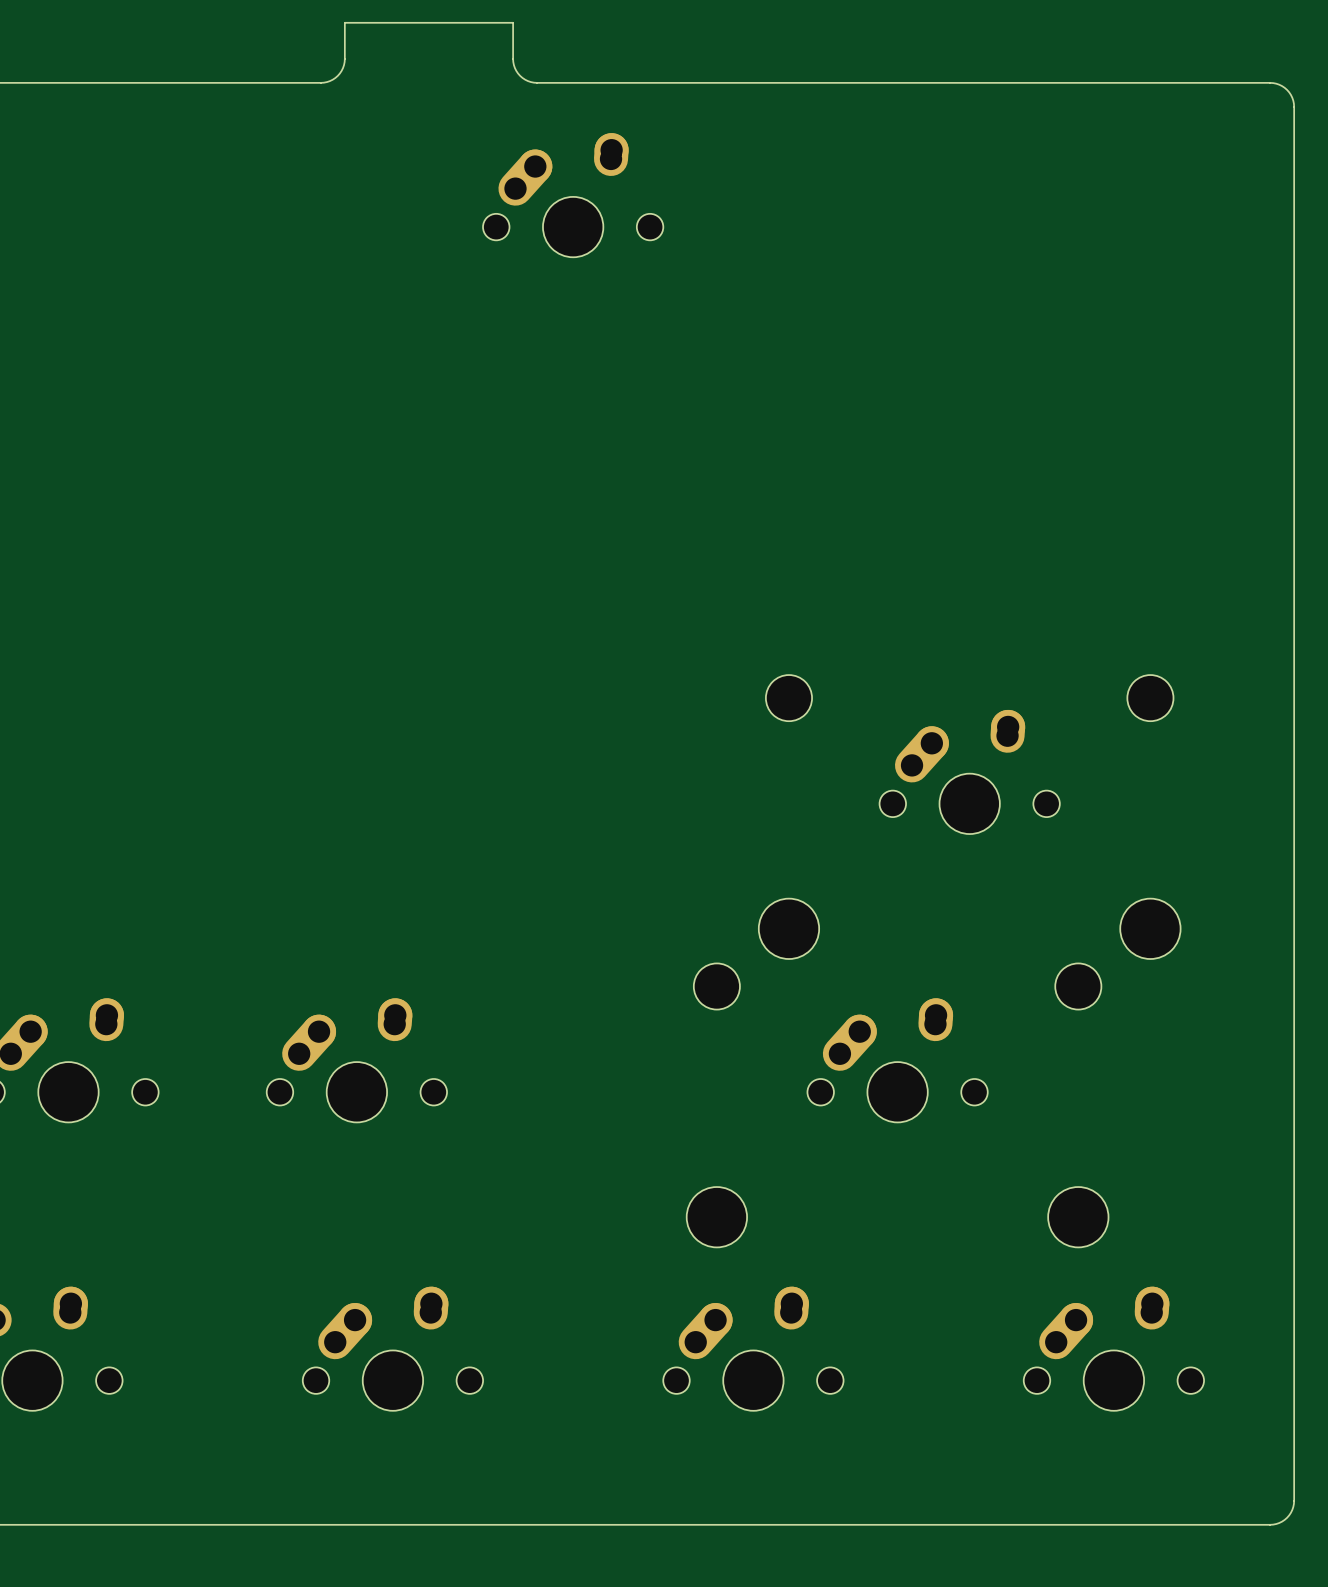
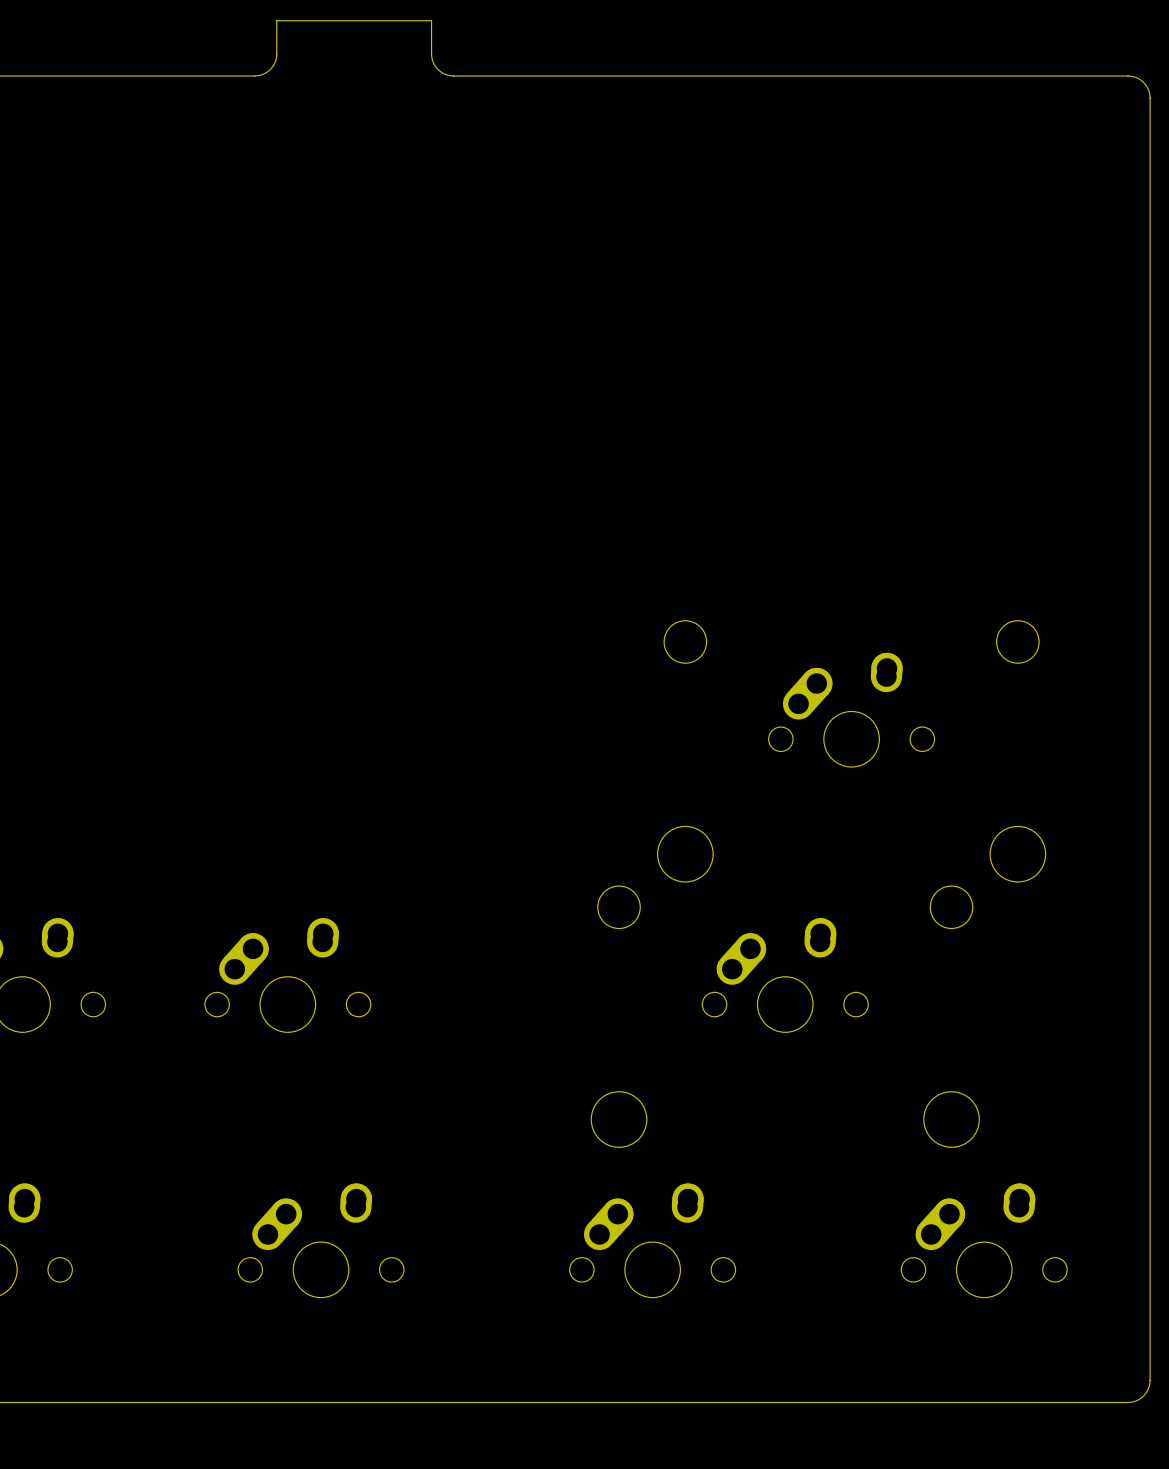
part: (573, 195) -> none

